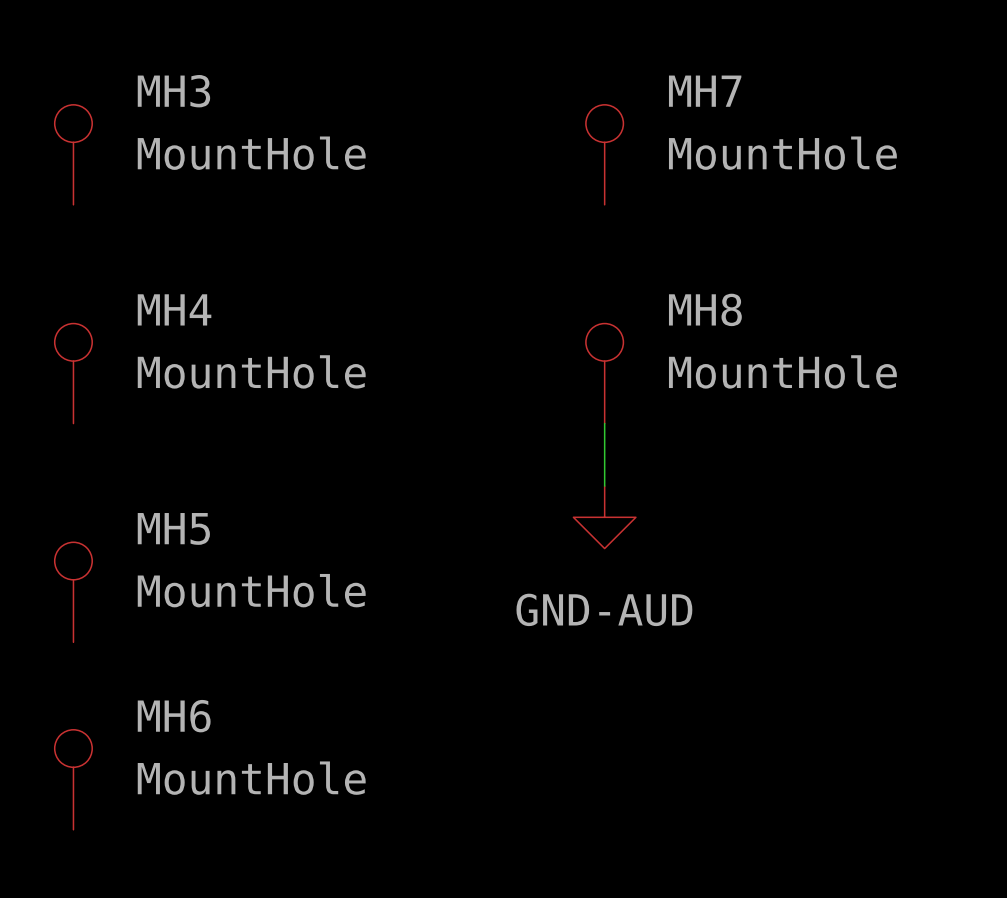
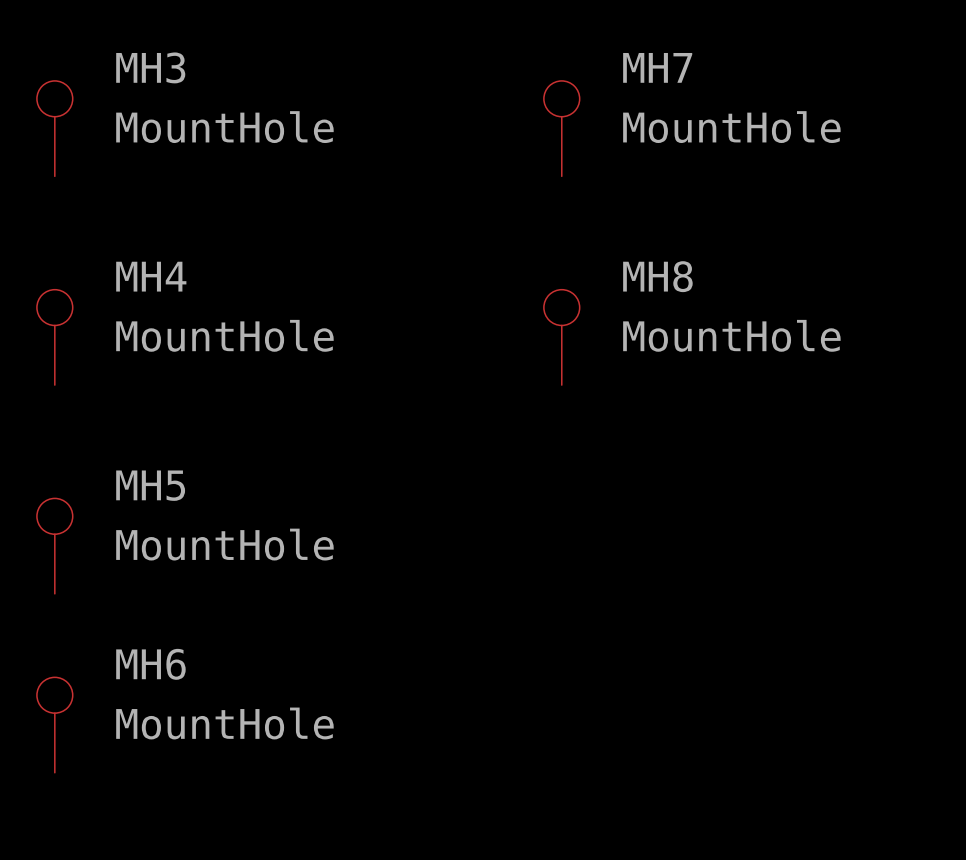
wire: (604, 423) (604, 486) -> none
power symbol: GND-AUD (604, 517) -> none

